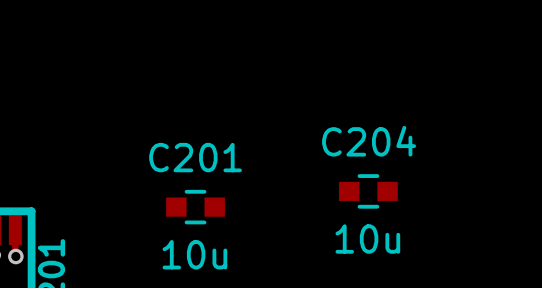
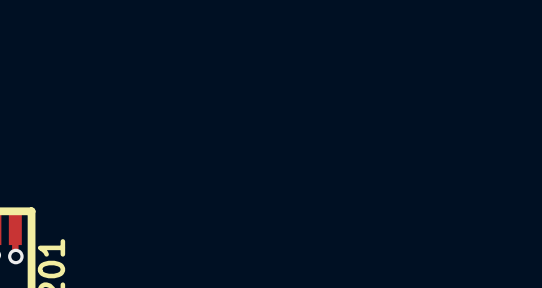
C204: 10u (368, 191) -> none
C201: 10u (195, 207) -> none

